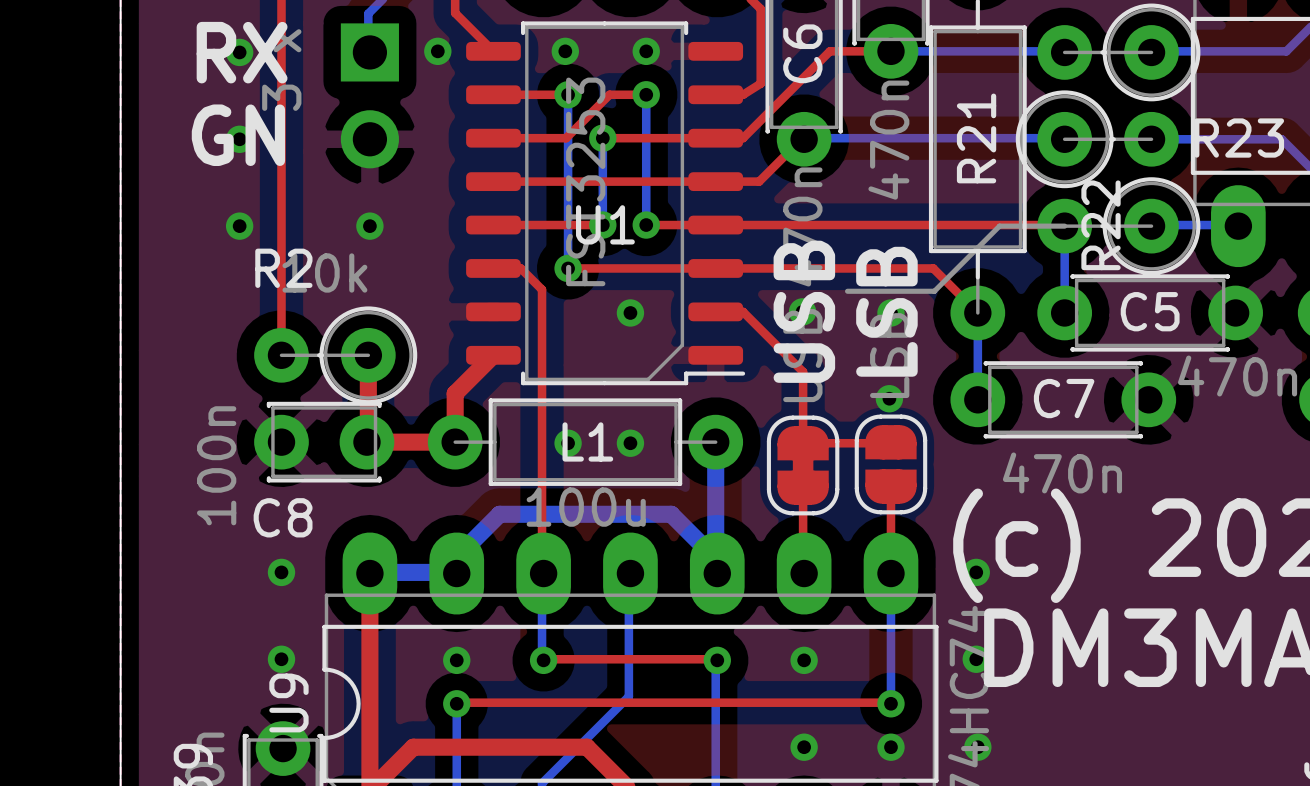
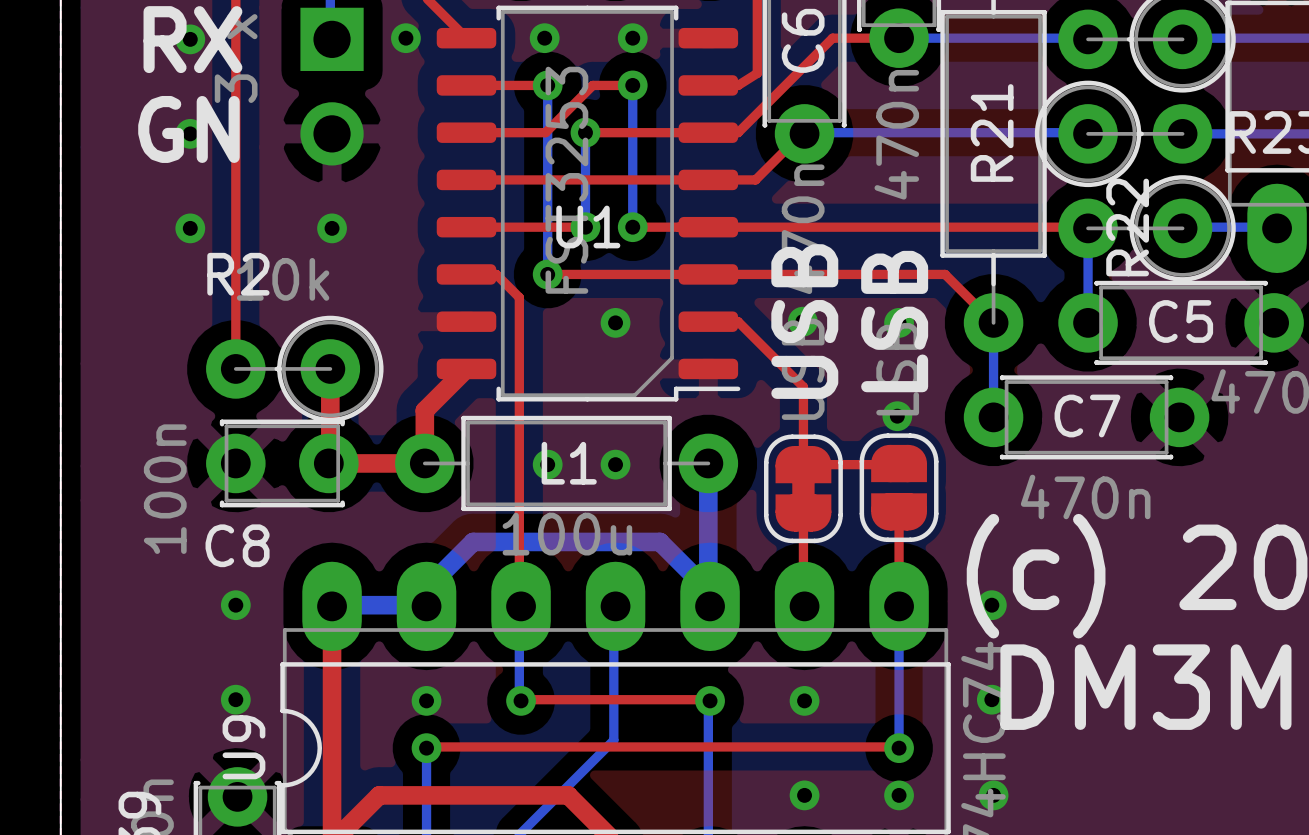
line: (1064, 226) (999, 226) (934, 291) (847, 291) -> none

